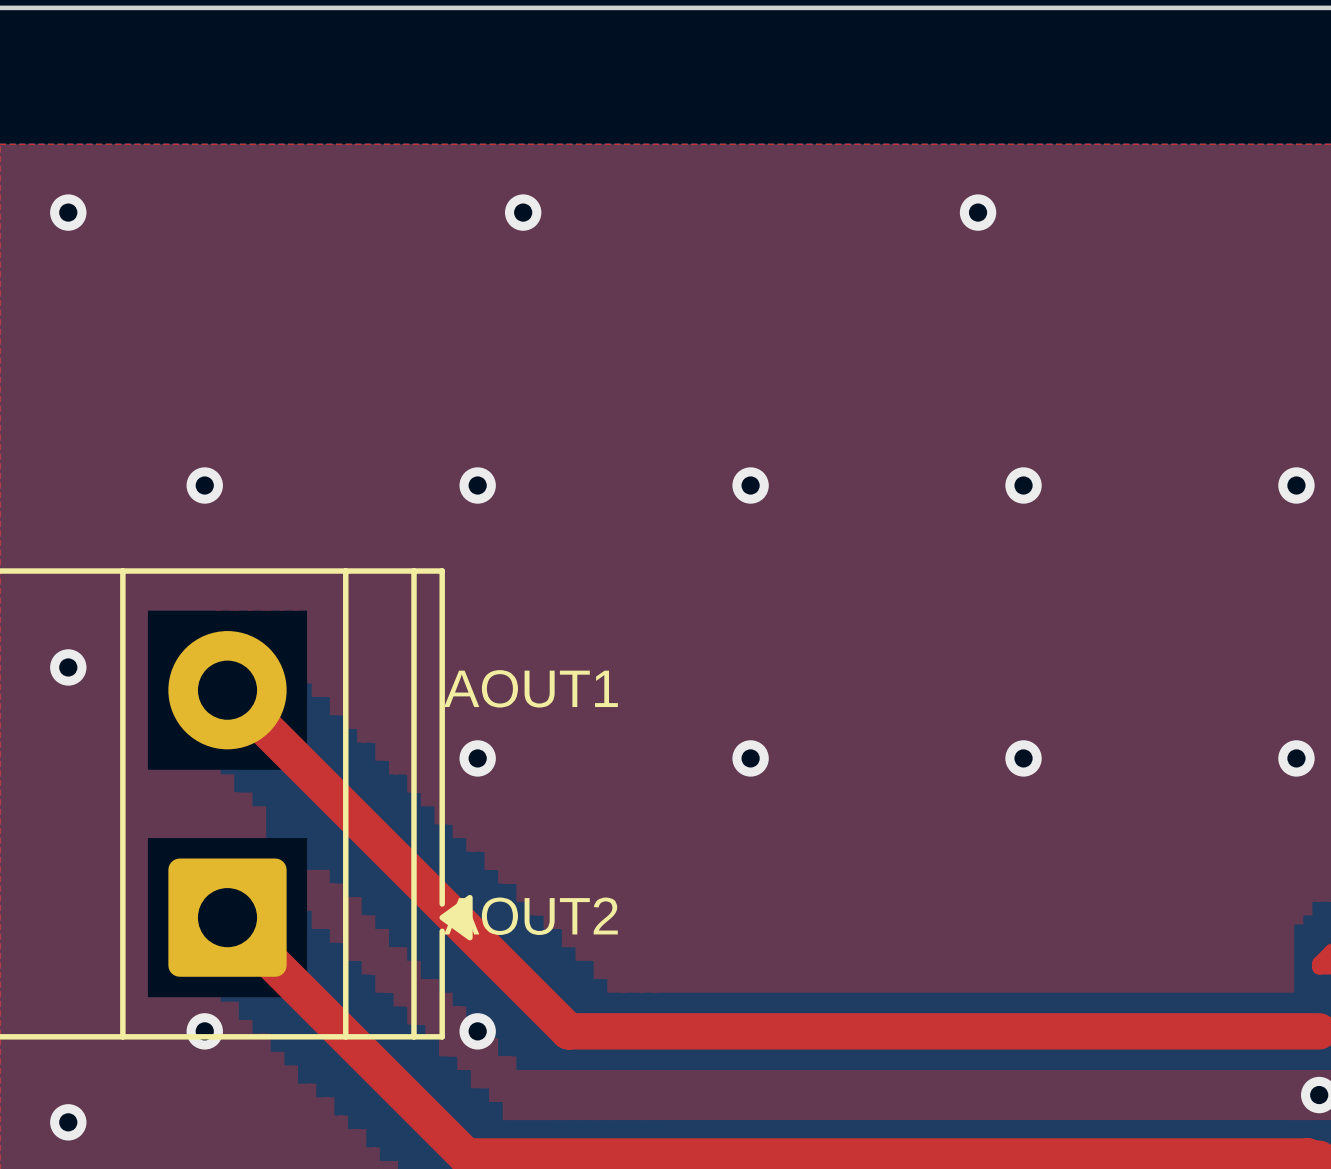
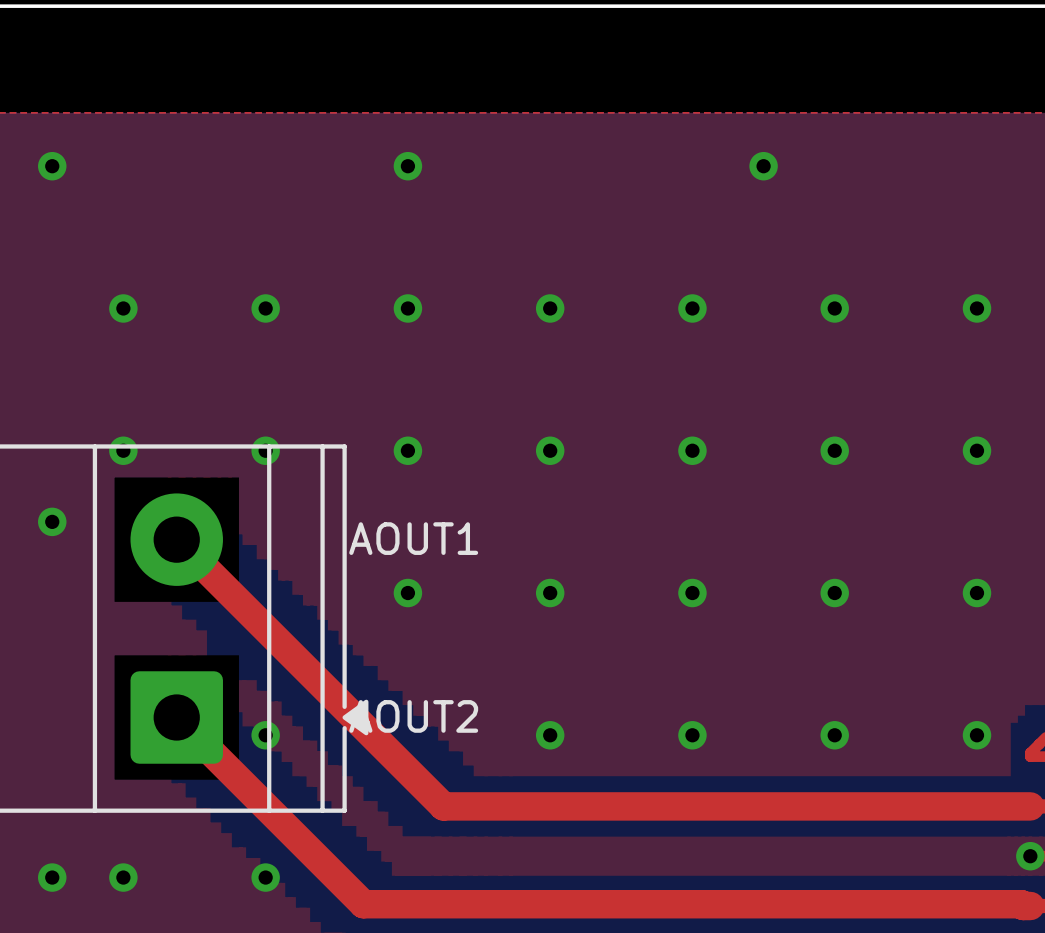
via: none -> (123, 308)
via: none -> (265, 308)
via: none -> (407, 308)
via: none -> (550, 308)
via: none -> (692, 308)
via: none -> (834, 308)
via: none -> (976, 308)
via: (204, 485) -> none
via: (477, 485) -> none
via: (750, 485) -> none
via: (1023, 485) -> none
via: (1296, 485) -> none
via: none -> (123, 450)
via: none -> (265, 450)
via: none -> (407, 450)
via: none -> (550, 450)
via: none -> (692, 450)
via: none -> (834, 450)
via: none -> (976, 450)
via position: (477, 758) -> (407, 593)
via position: (750, 758) -> (550, 593)
via: none -> (692, 593)
via position: (1023, 758) -> (834, 593)
via position: (1296, 758) -> (976, 593)
via: none -> (265, 735)
via: none -> (550, 735)
via: none -> (692, 735)
via: none -> (834, 735)
via: none -> (976, 735)
via: (204, 1031) -> none
via: (477, 1031) -> none
via: none -> (123, 877)
via: none -> (265, 877)

